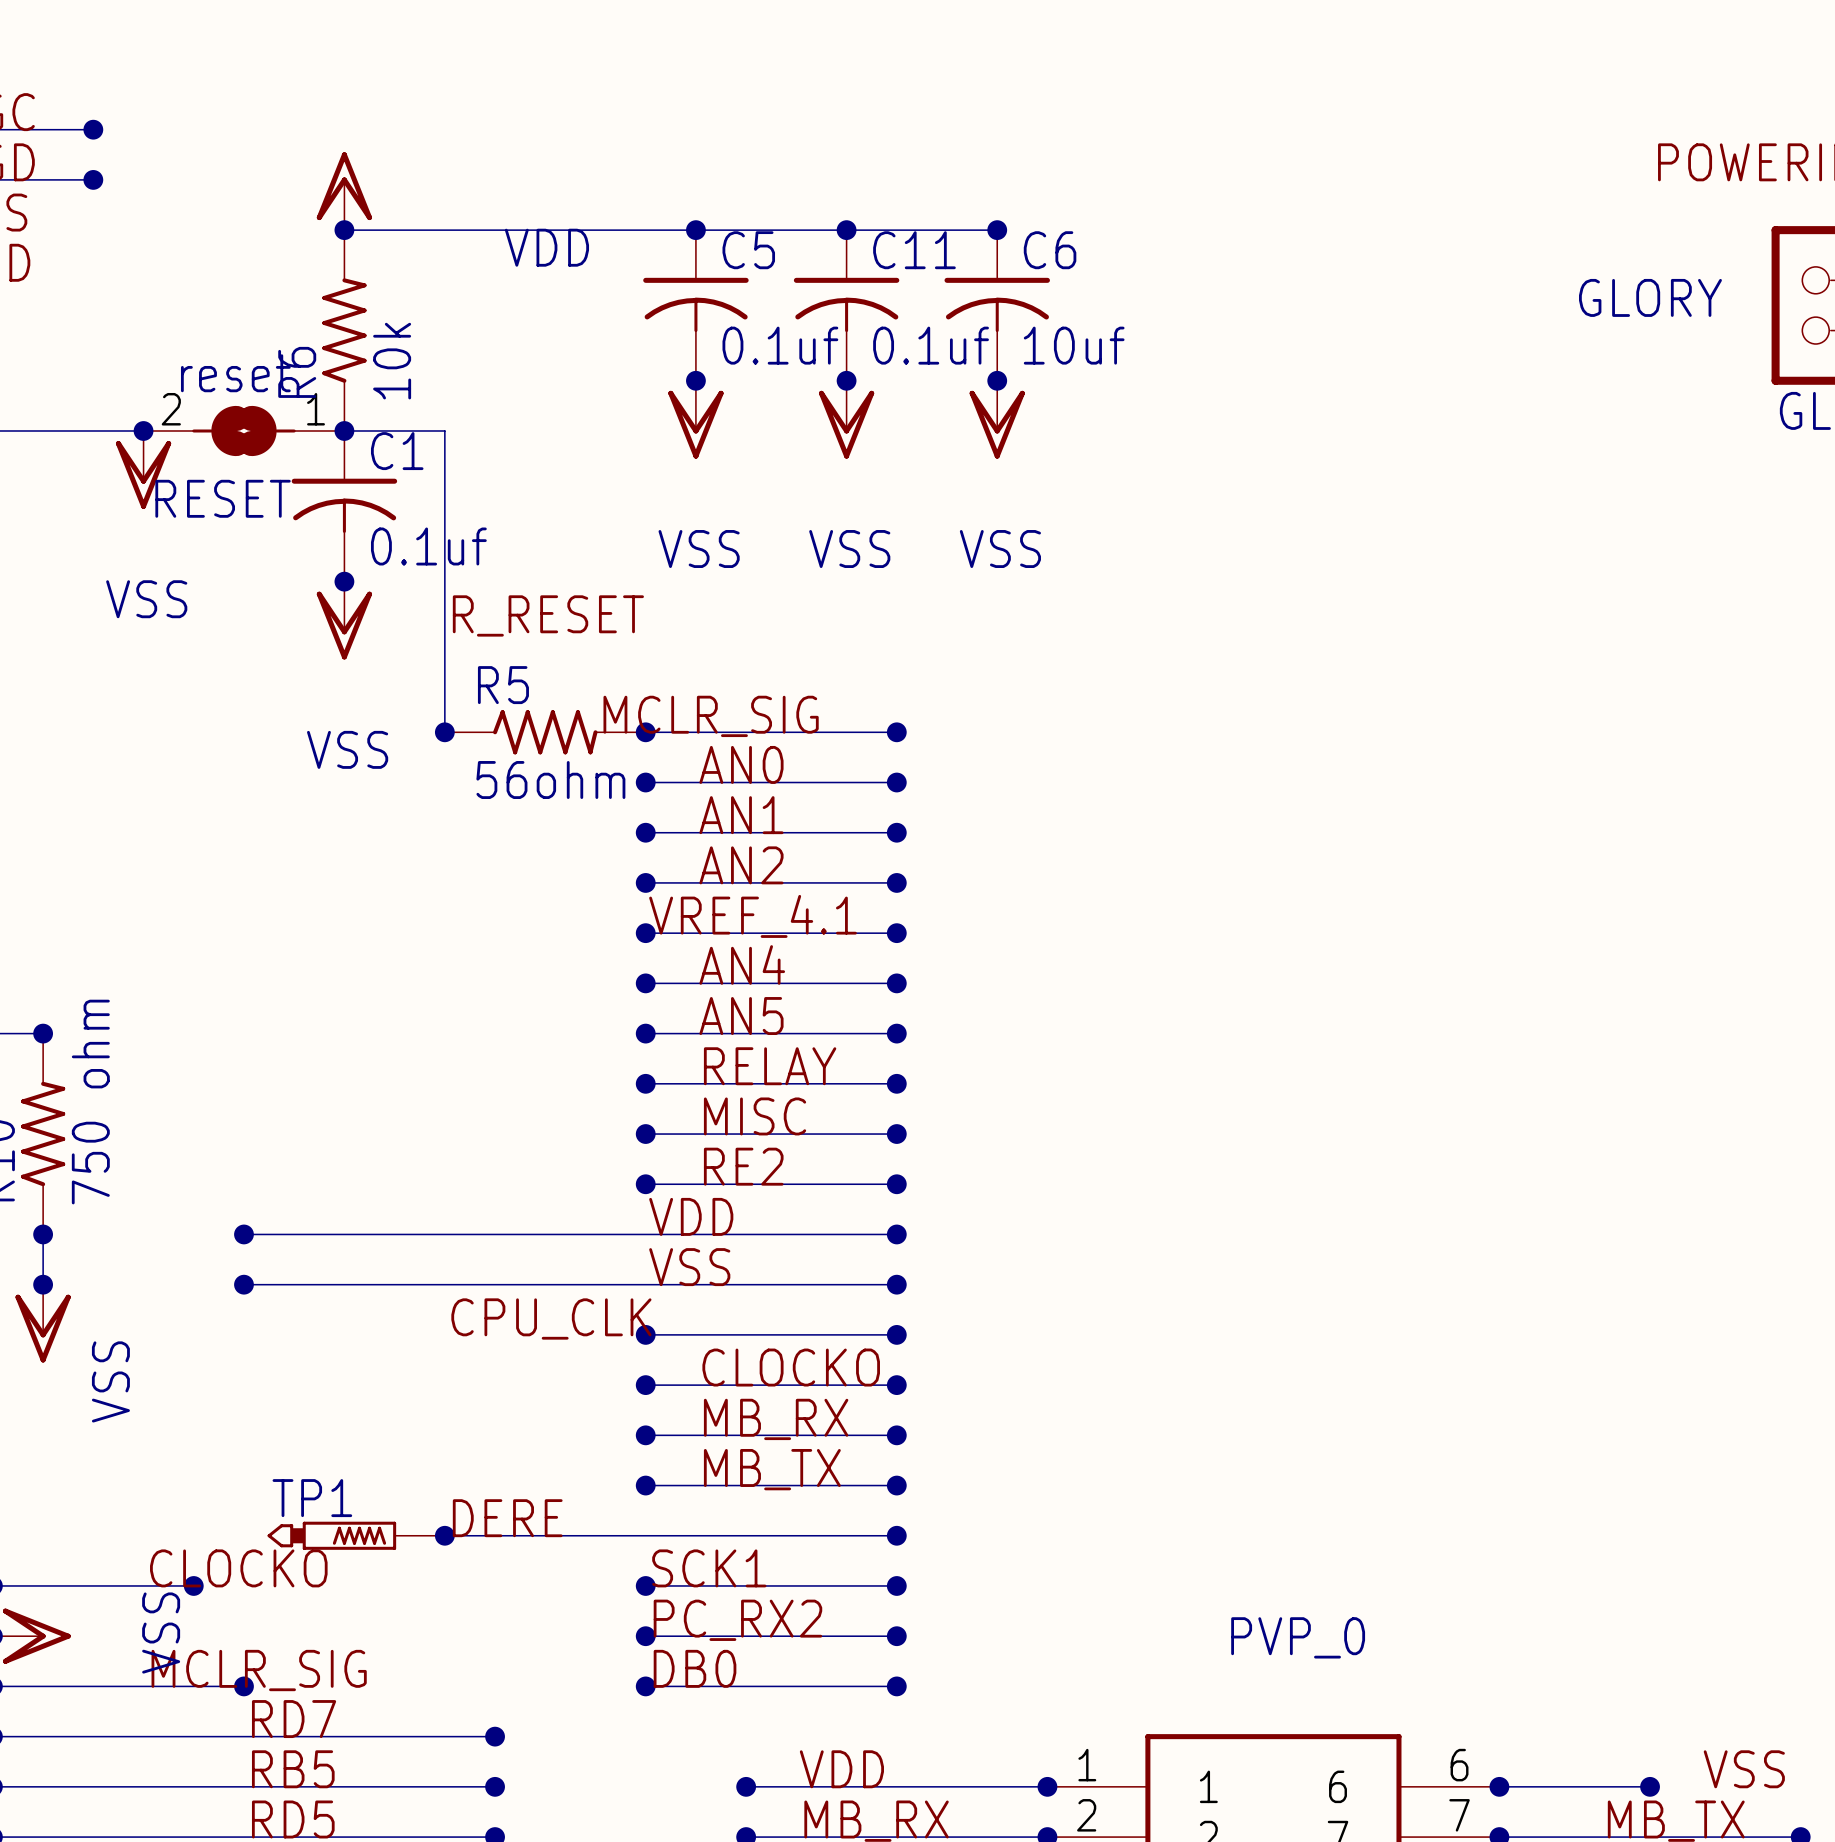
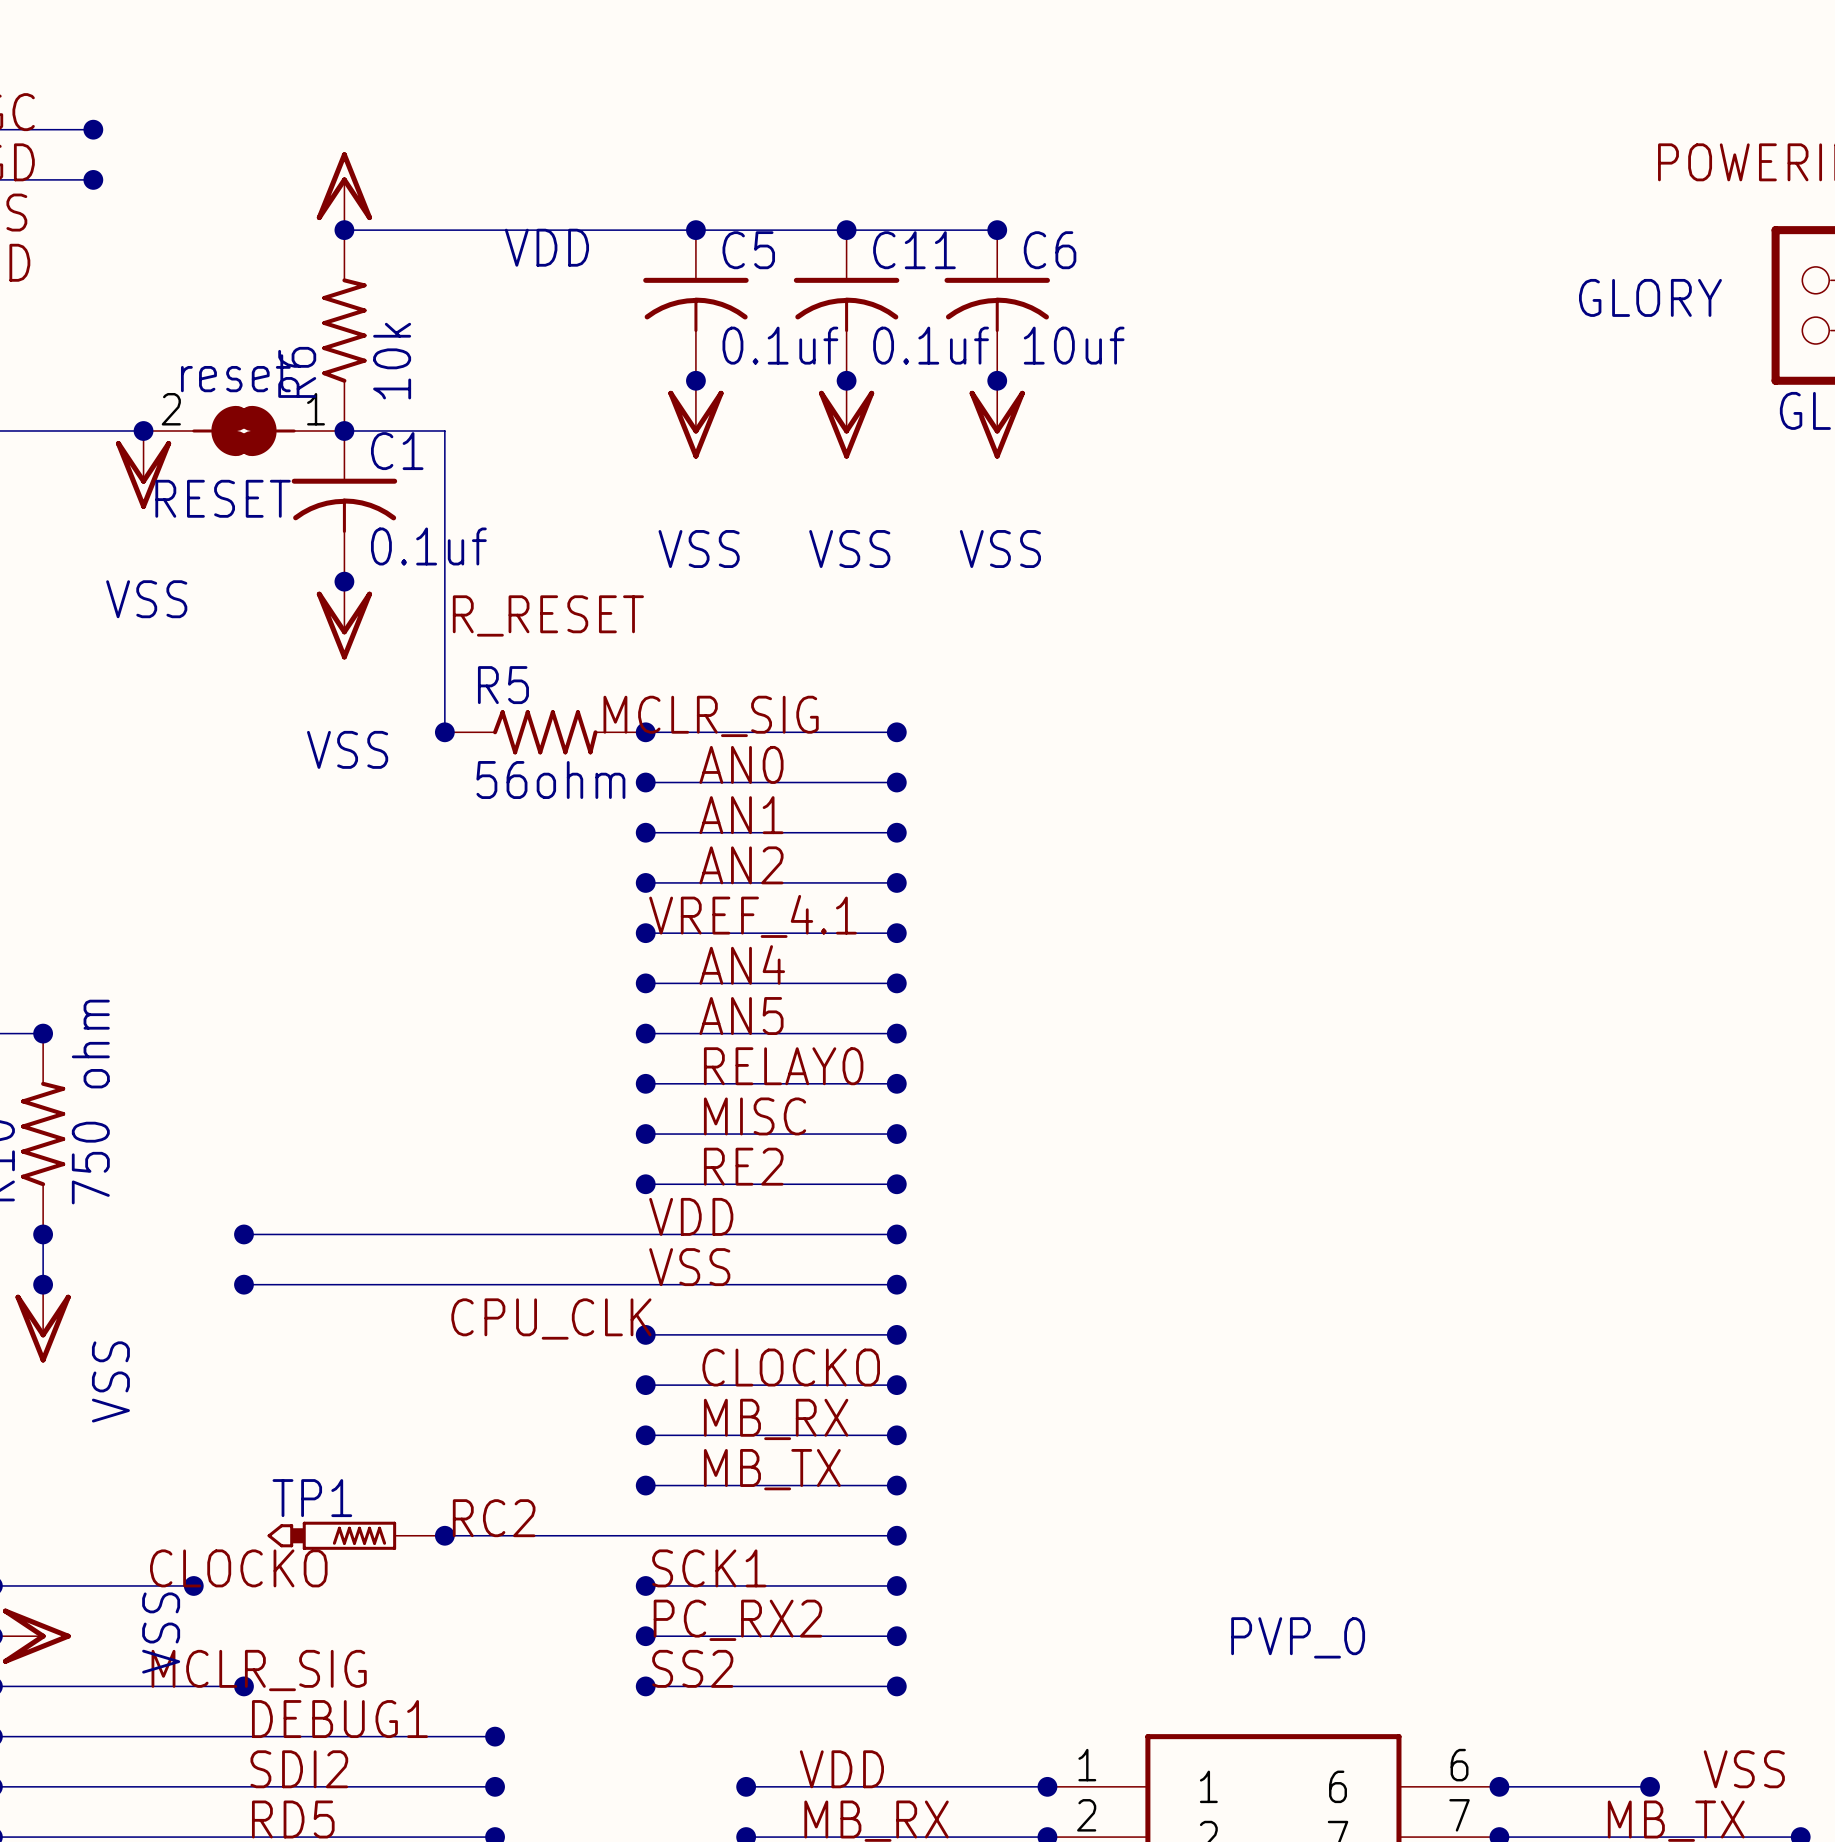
label: RELAY (770, 1066) -> RELAY0 (783, 1066)
label: DERE (507, 1518) -> RC2 (494, 1518)
label: DB0 (695, 1668) -> SS2 (692, 1668)
label: RD7 (294, 1719) -> DEBUG1 (339, 1719)
label: RB5 (293, 1769) -> SDI2 (299, 1769)

